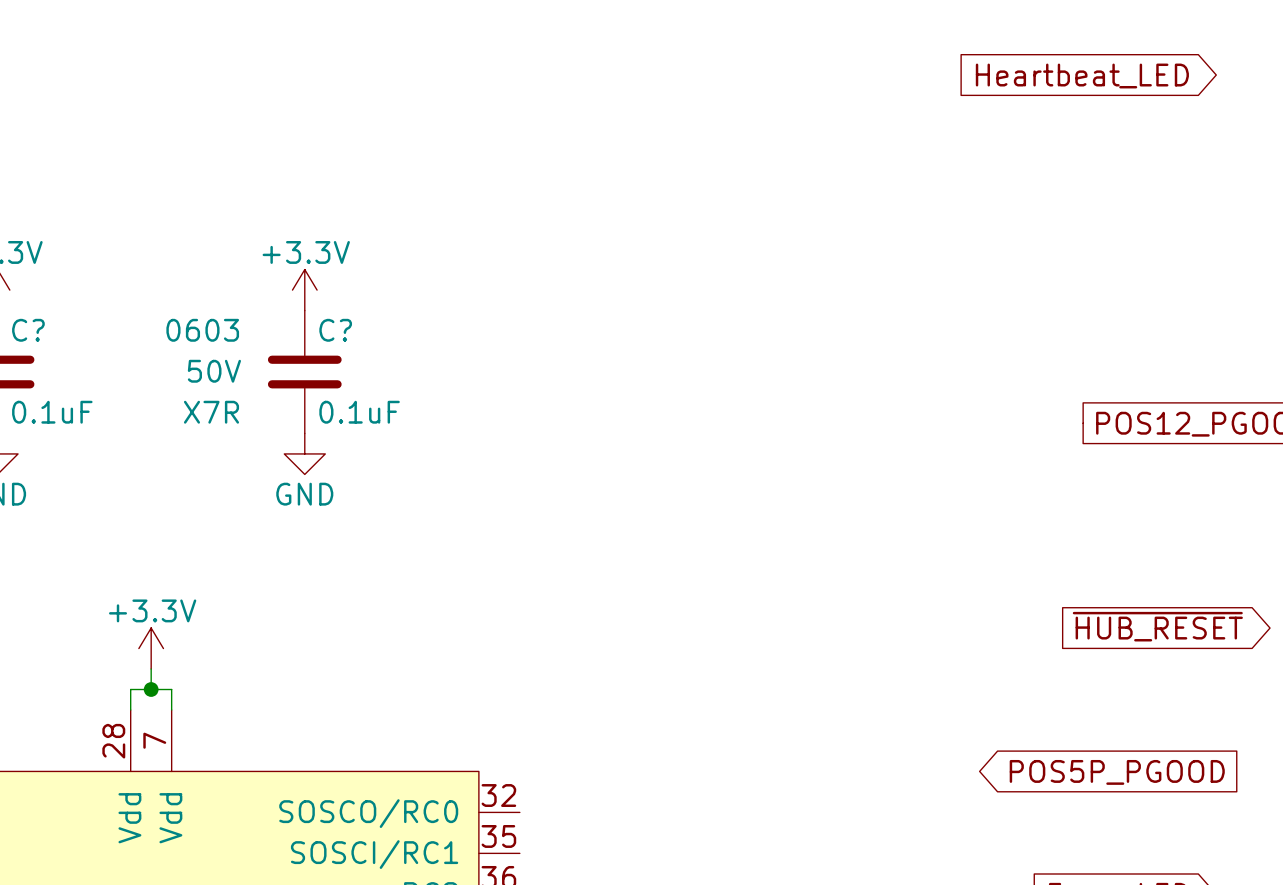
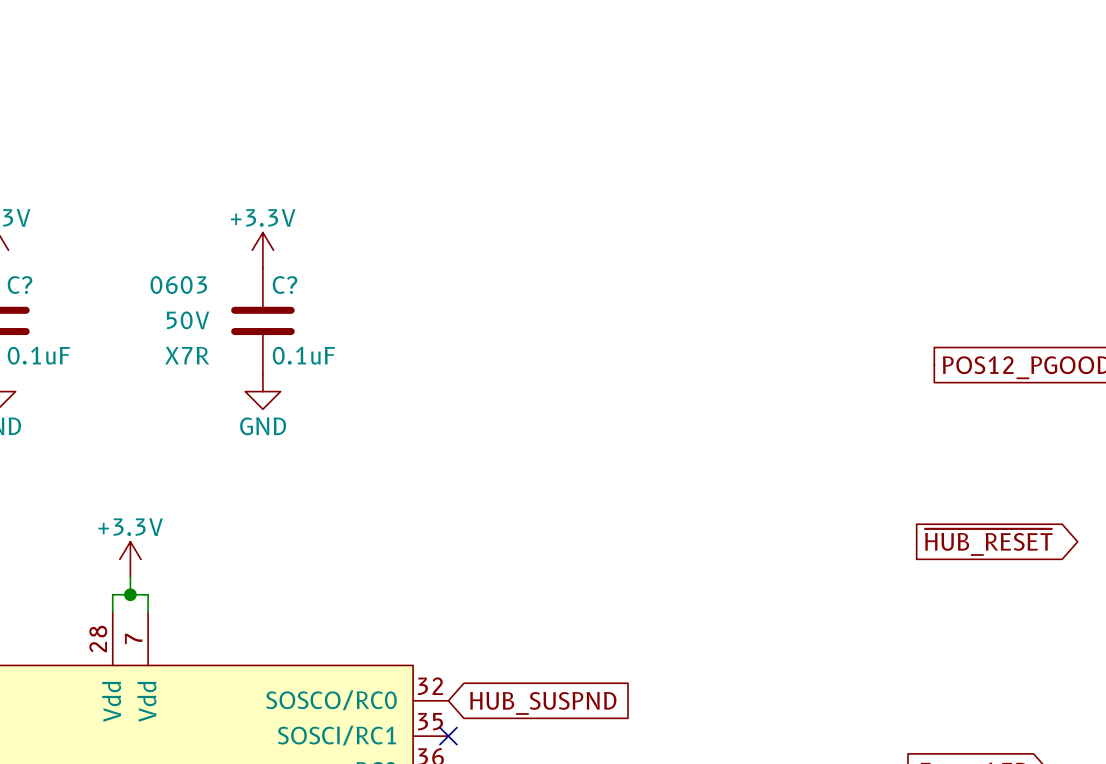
global label: Heartbeat_LED (1082, 76) -> none
global label: POS5P_PGOOD (1117, 772) -> none
global label: none -> HUB_SUSPND (543, 703)
no-connect mark: none -> (448, 736)

